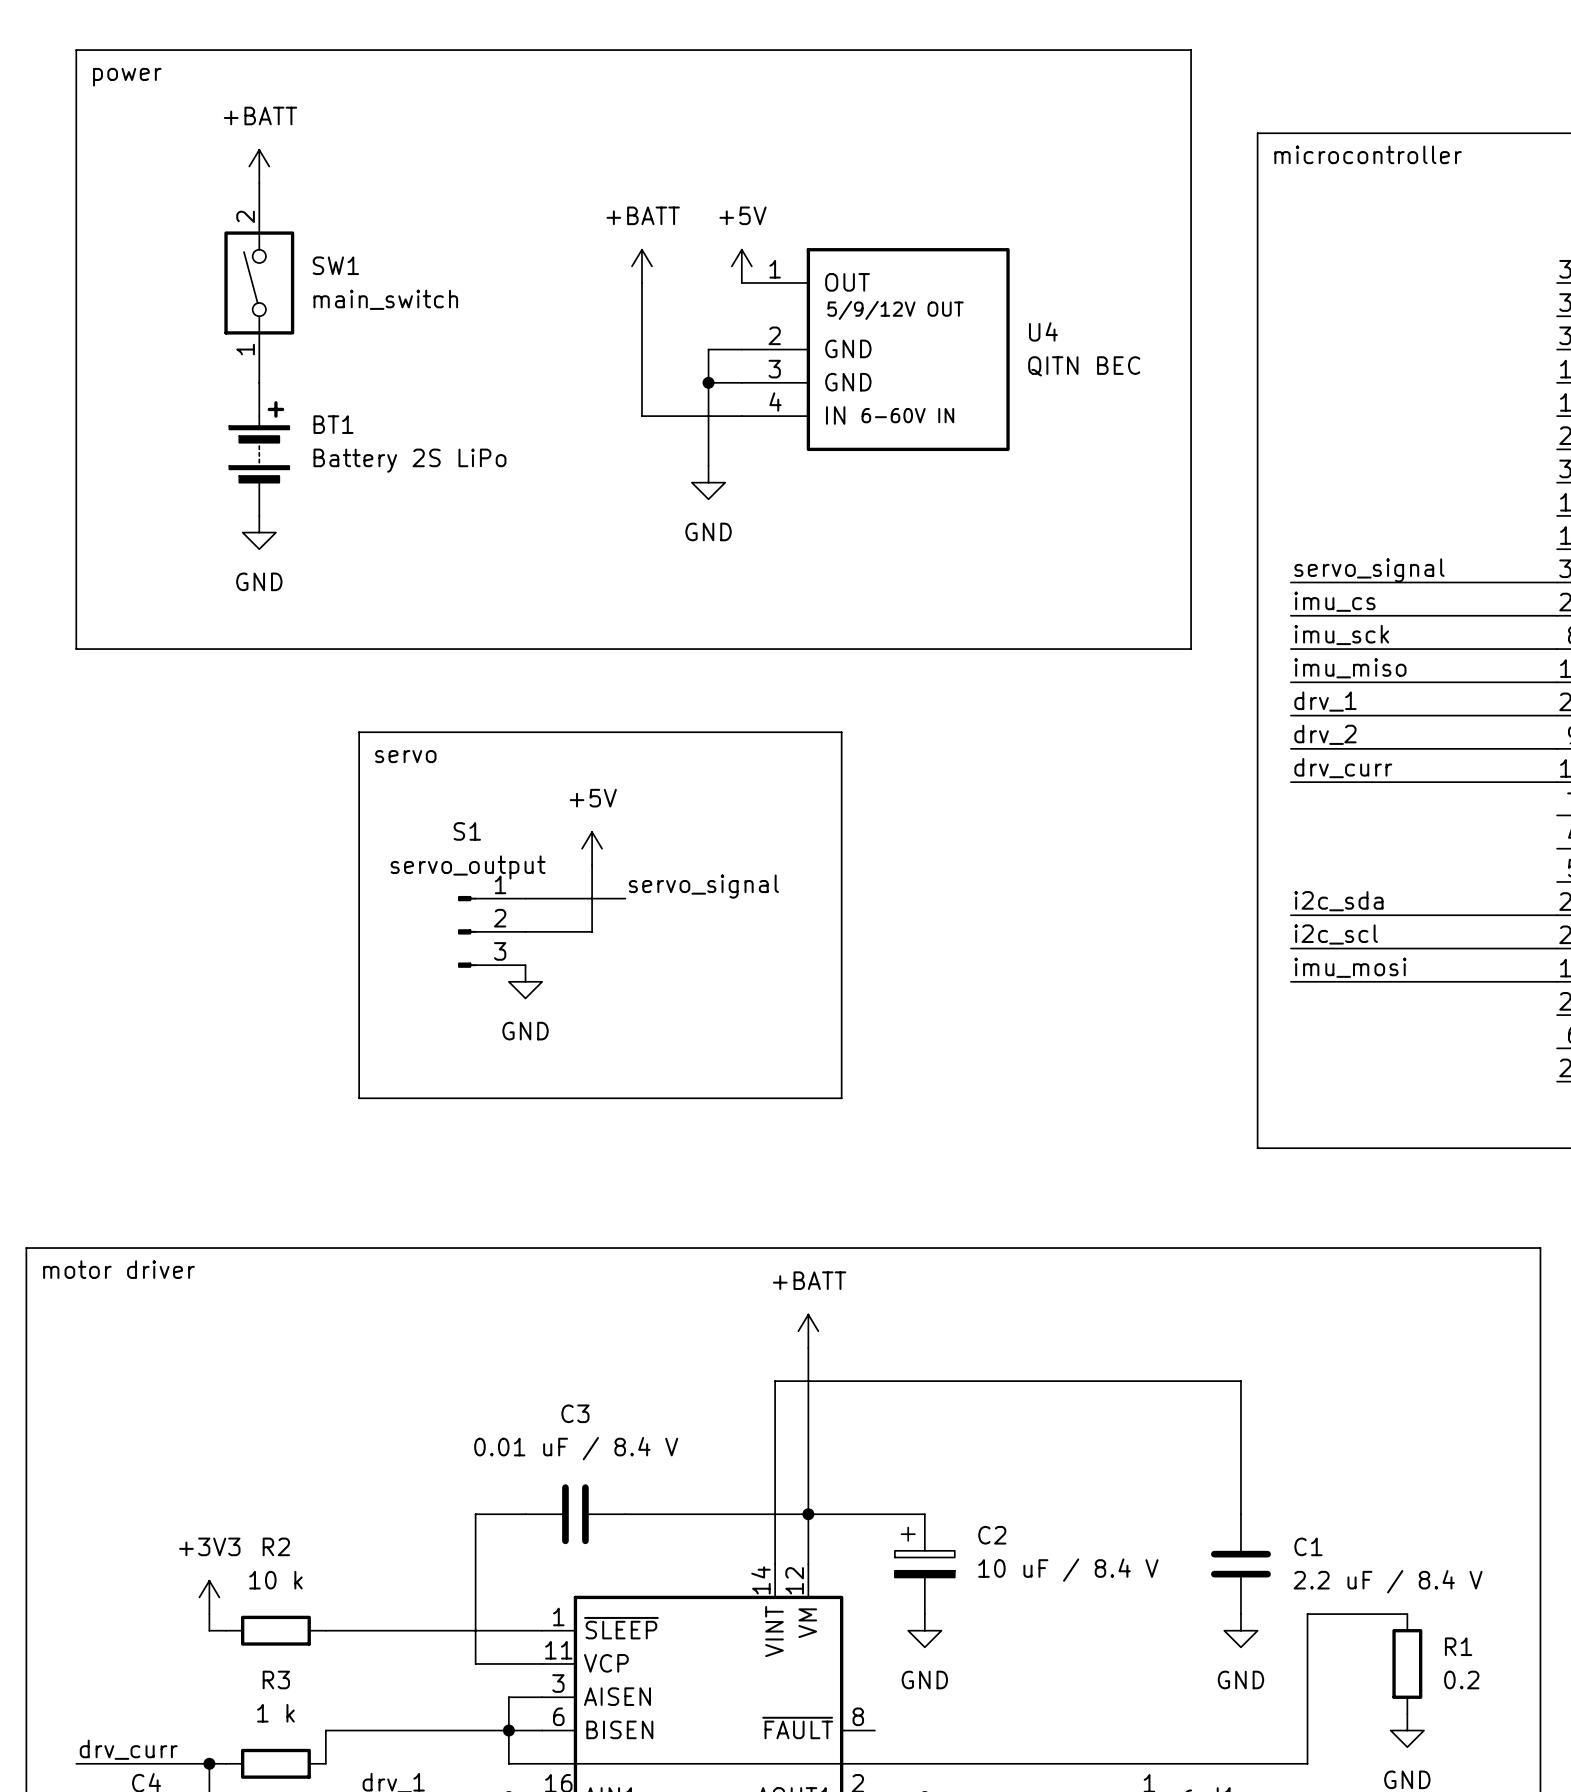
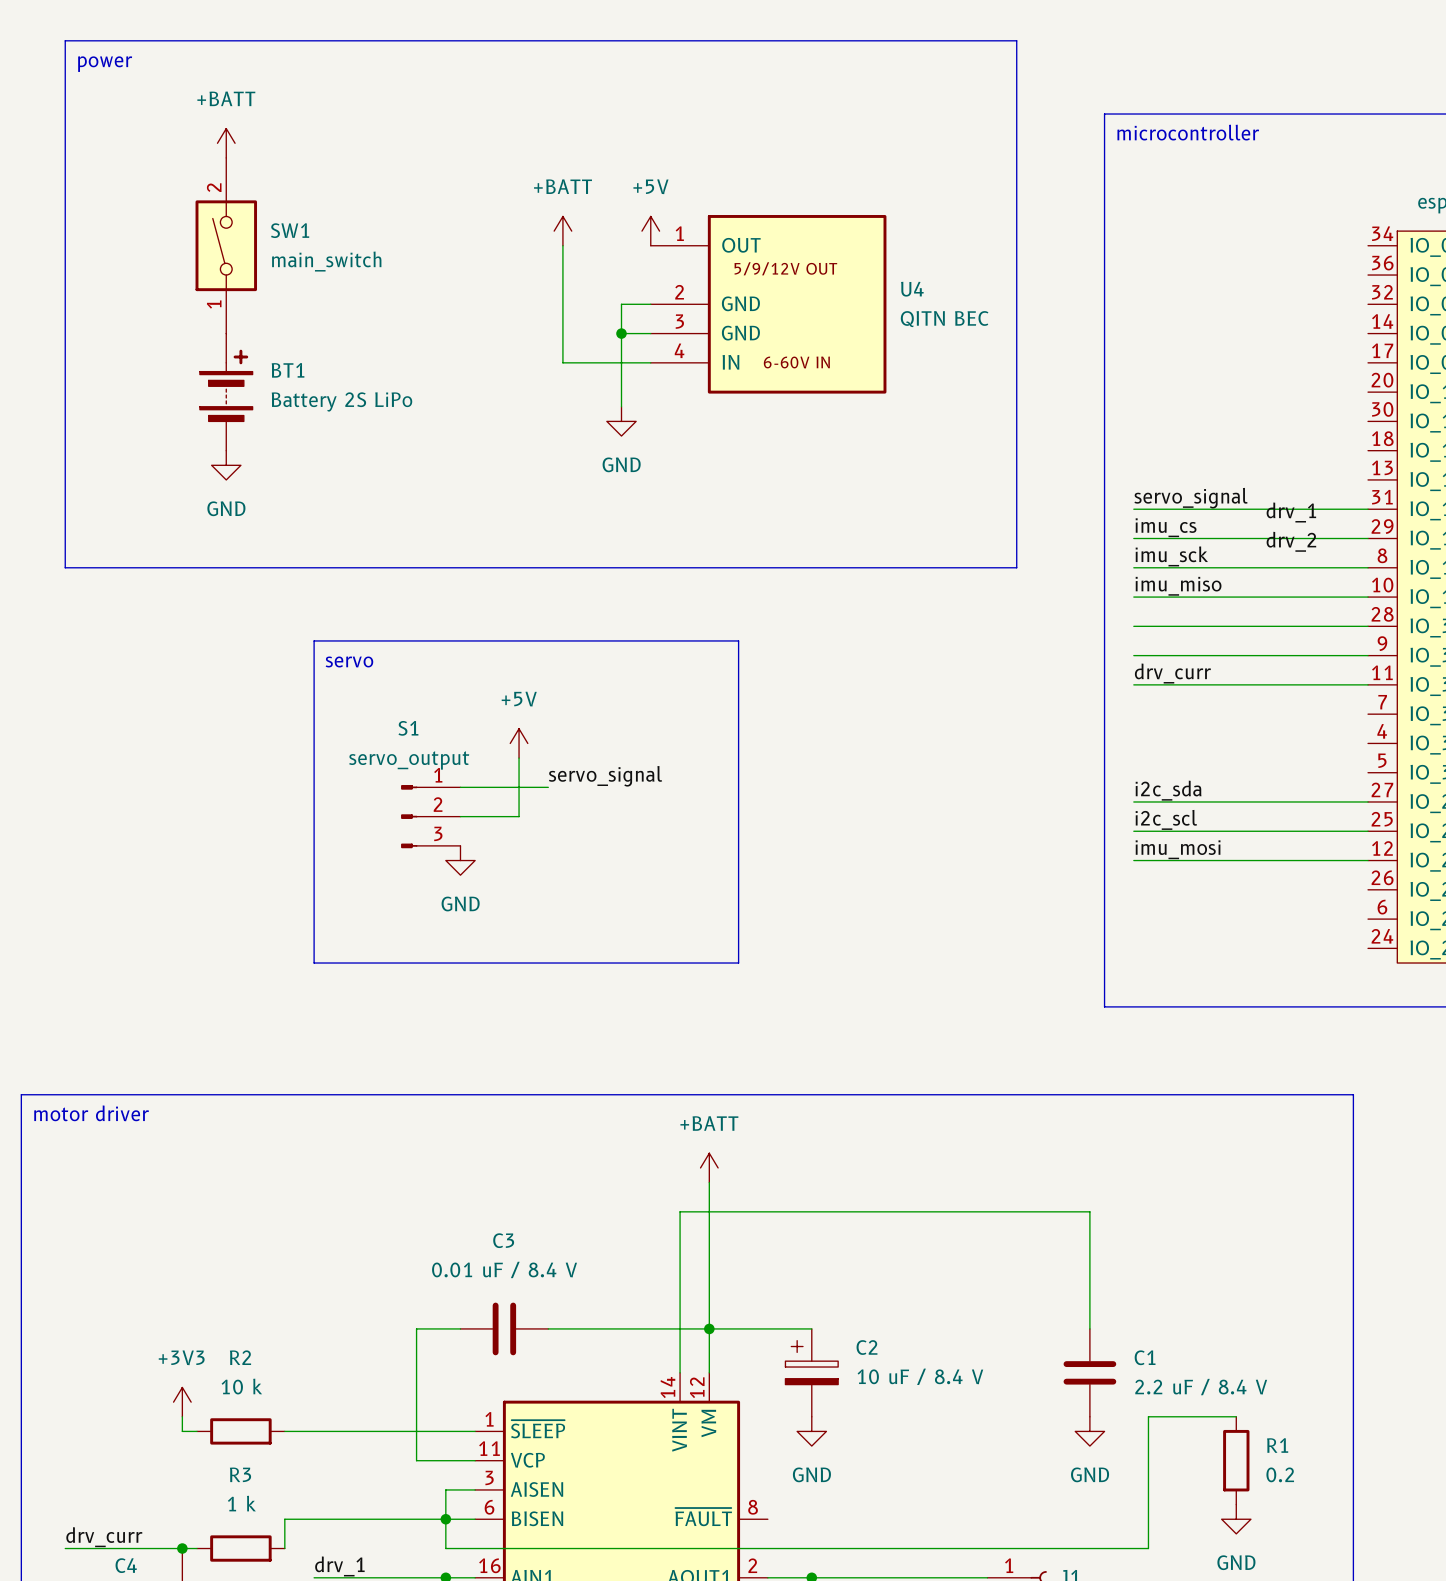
line: (1157, 50) (1191, 50) (1191, 649) (1157, 649) -> (1016, 40) (1016, 567)
label position: drv_1 (1325, 701) -> drv_1 (1291, 512)
label position: drv_2 (1325, 734) -> drv_2 (1291, 541)

